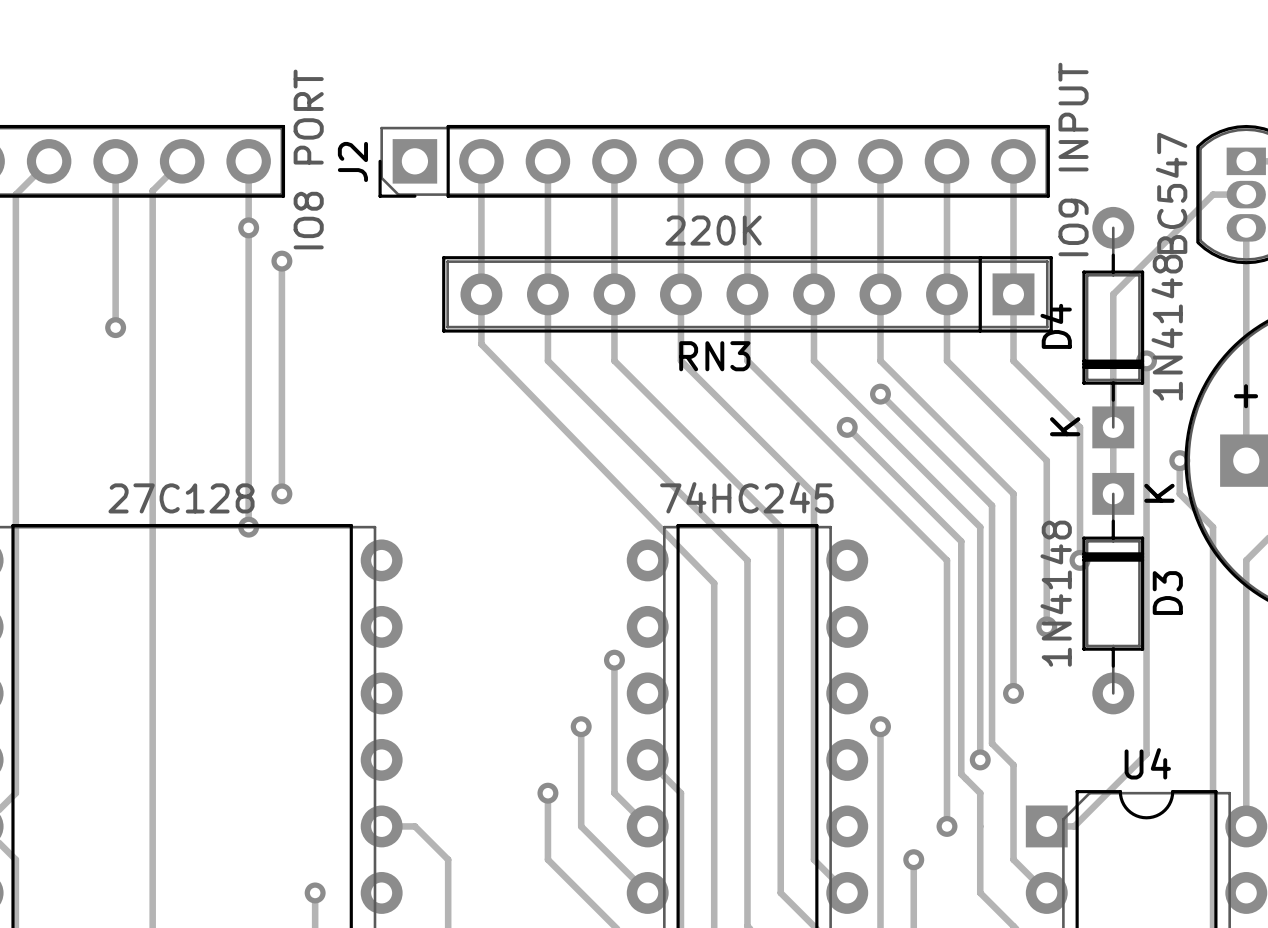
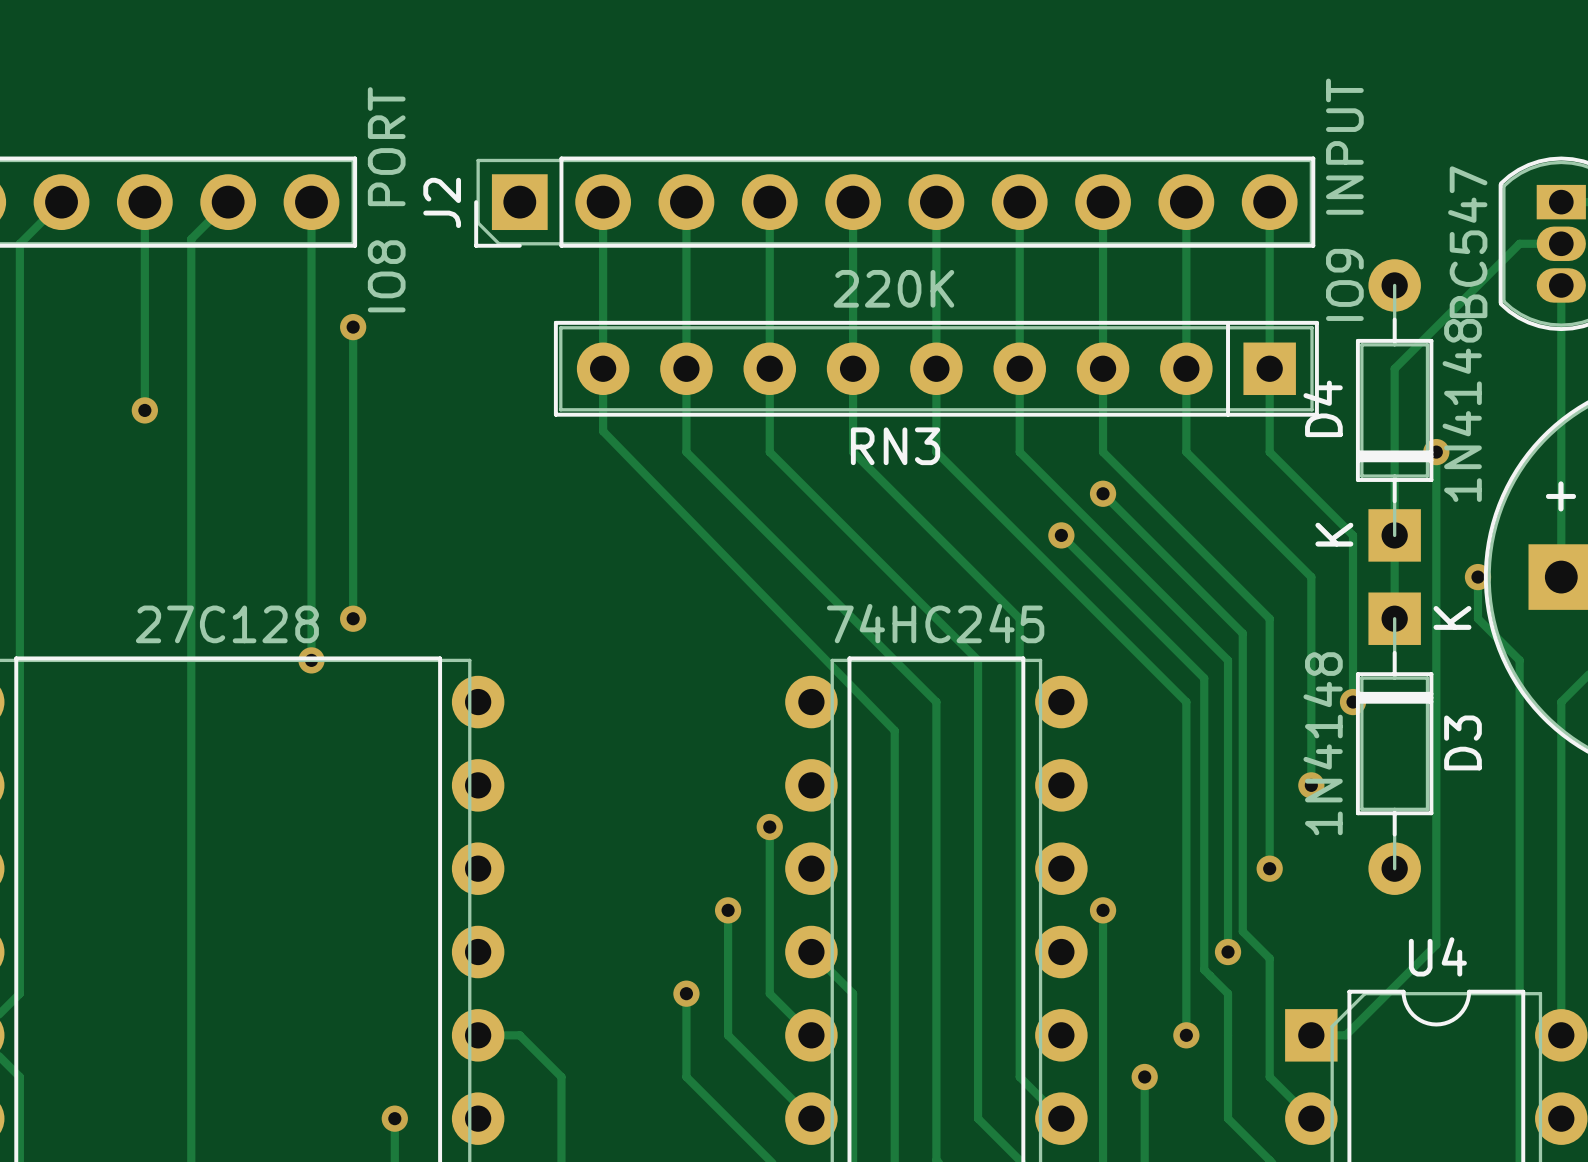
via: (248, 227) -> none

